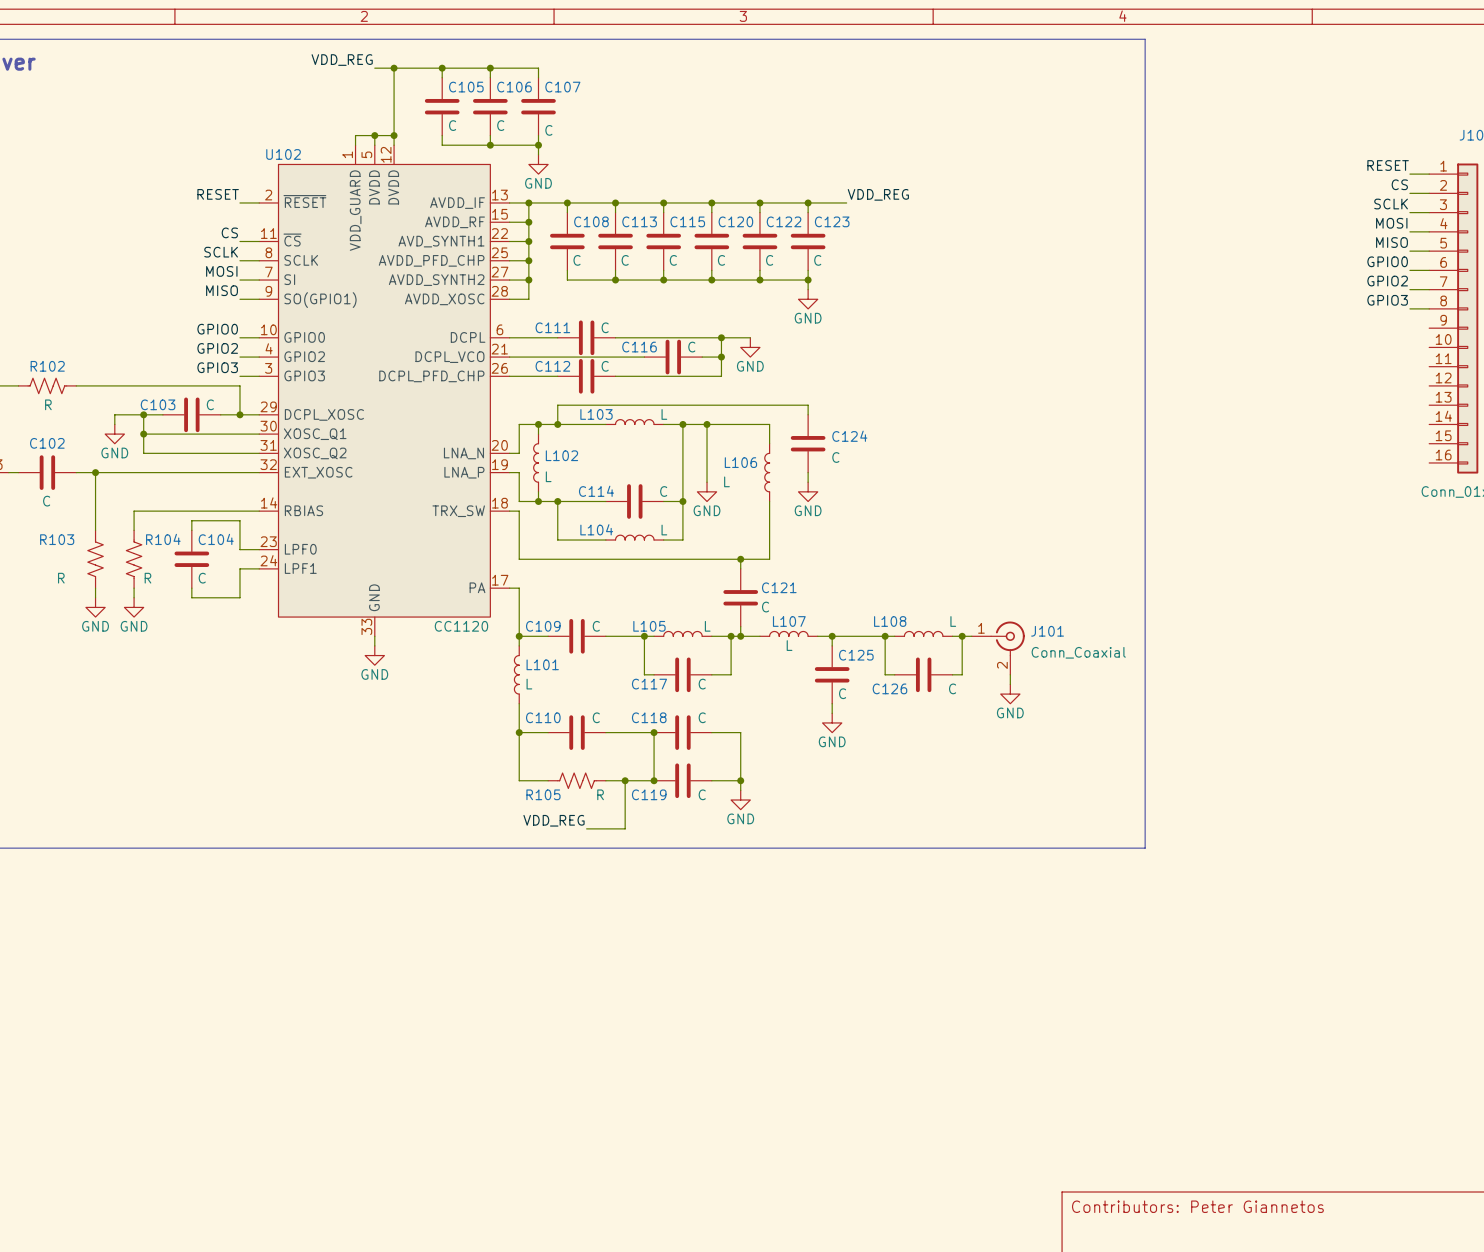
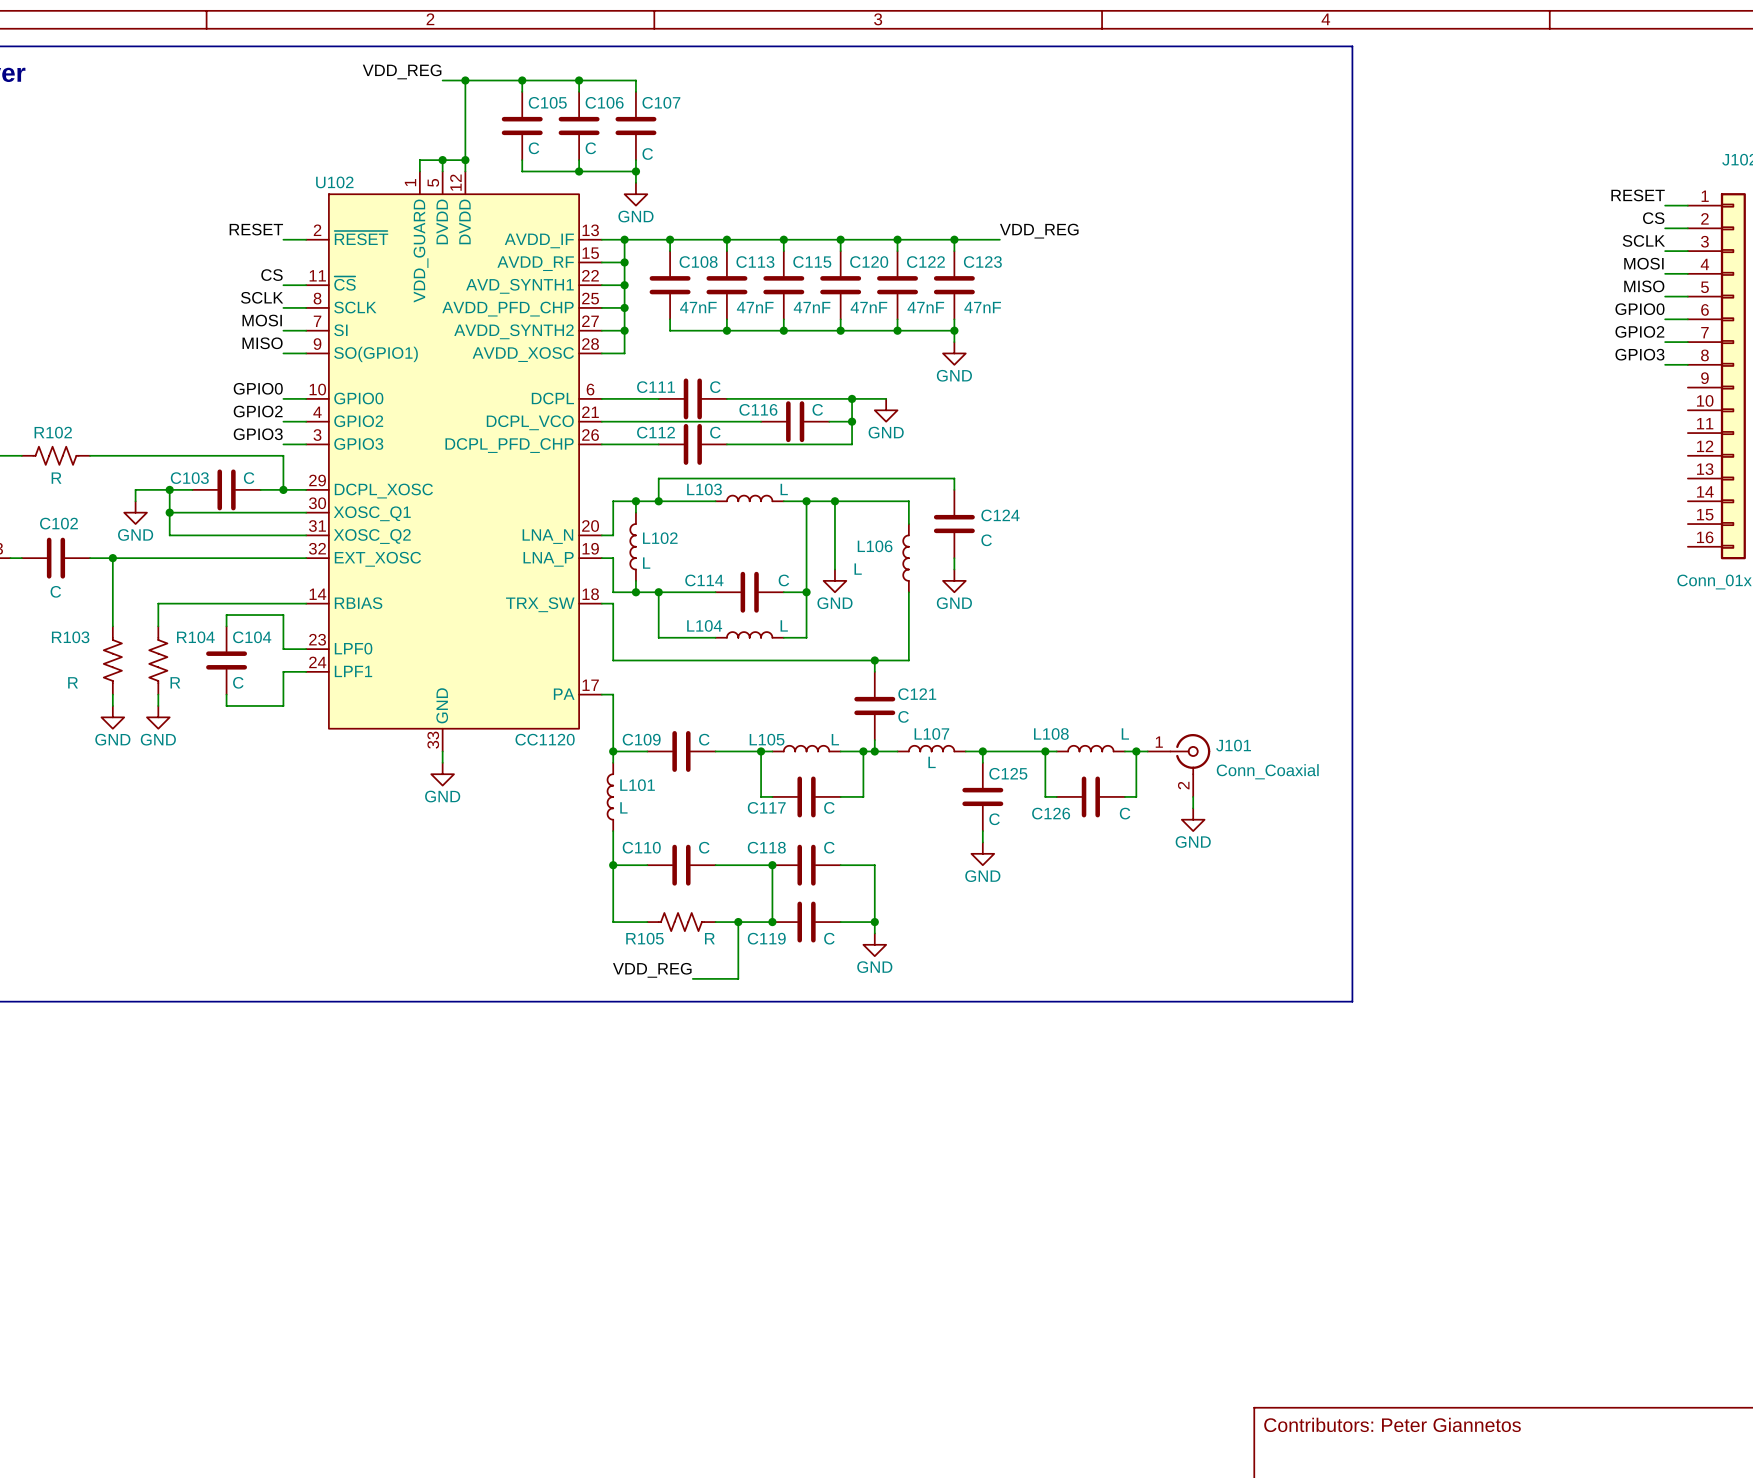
C108 value: C (577, 260) -> 47nF (698, 307)
C113 value: C (625, 260) -> 47nF (755, 307)
C115 value: C (673, 260) -> 47nF (812, 307)
C120 value: C (721, 260) -> 47nF (868, 307)
C122 value: C (769, 260) -> 47nF (925, 307)
C123 value: C (817, 260) -> 47nF (982, 307)

